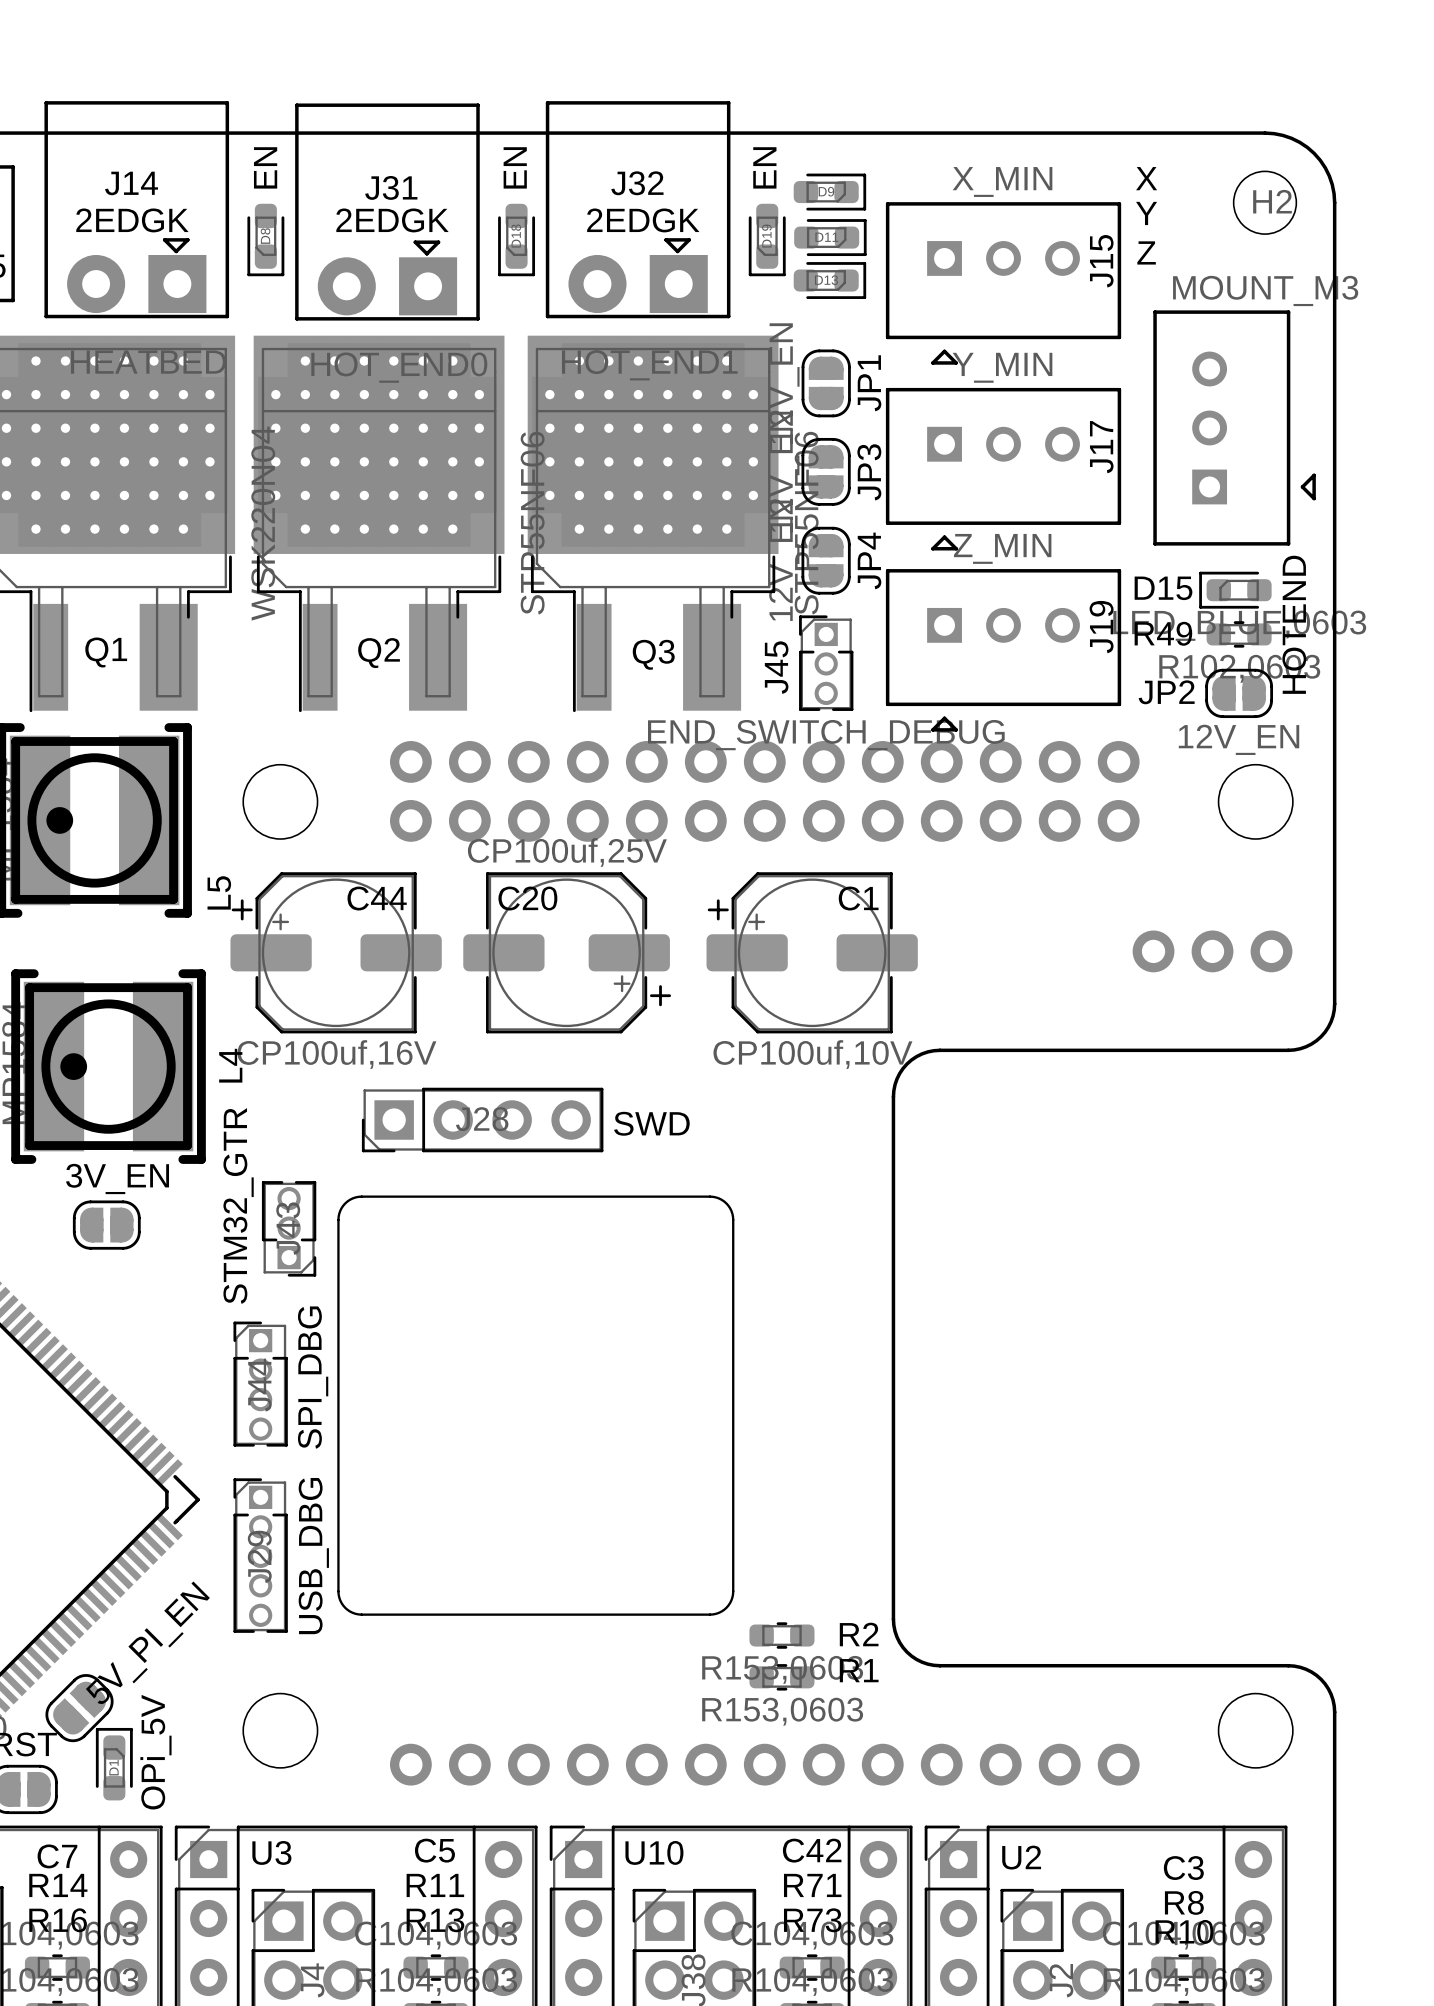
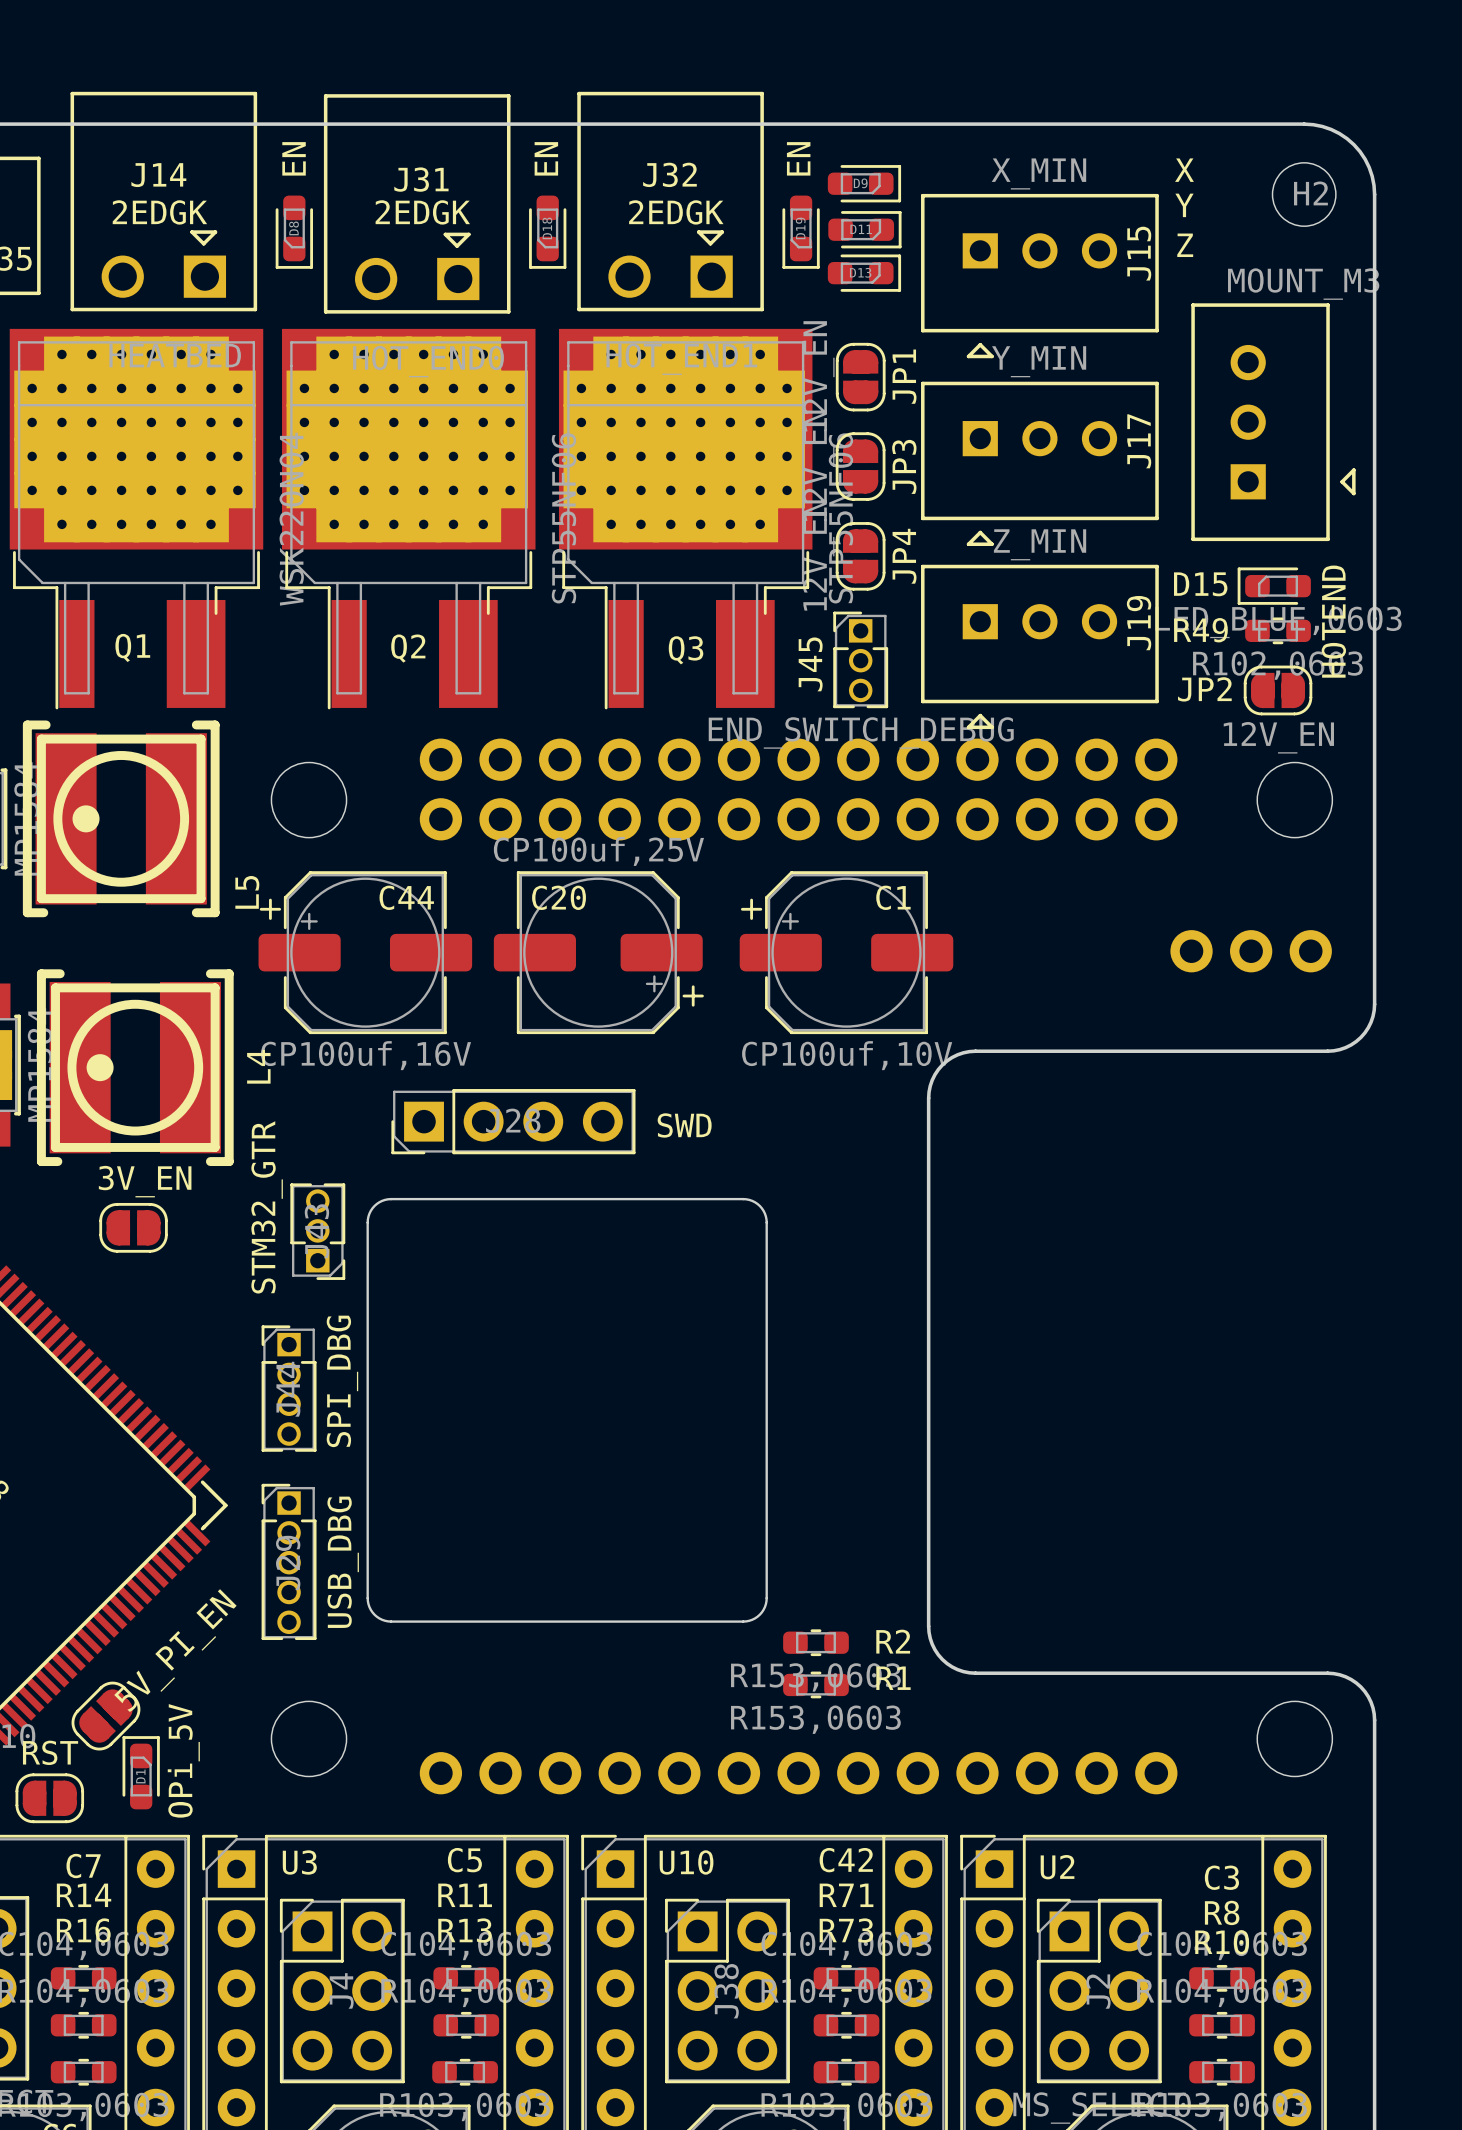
J14 footprint: [44, 101, 230, 319] -> [70, 91, 258, 312]
J32 footprint: [545, 101, 731, 319] -> [577, 91, 764, 312]
J31 footprint: [295, 103, 480, 321] -> [323, 94, 511, 314]

